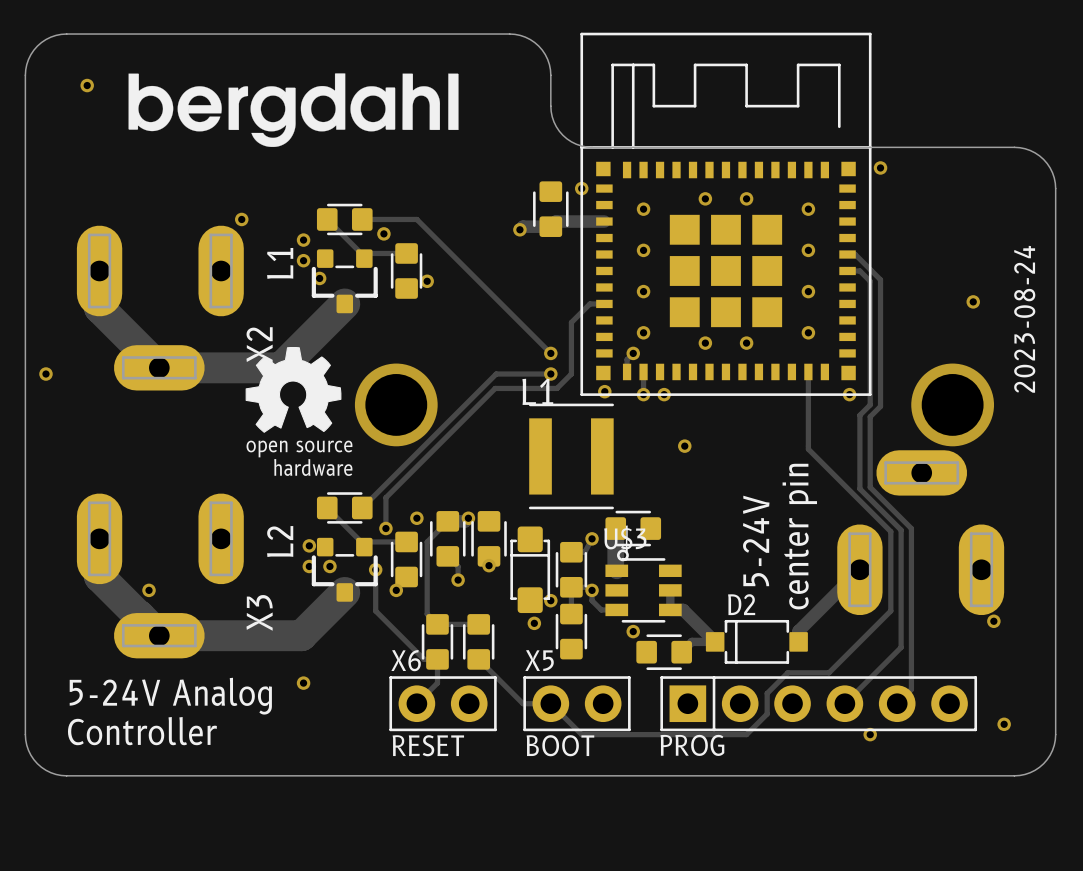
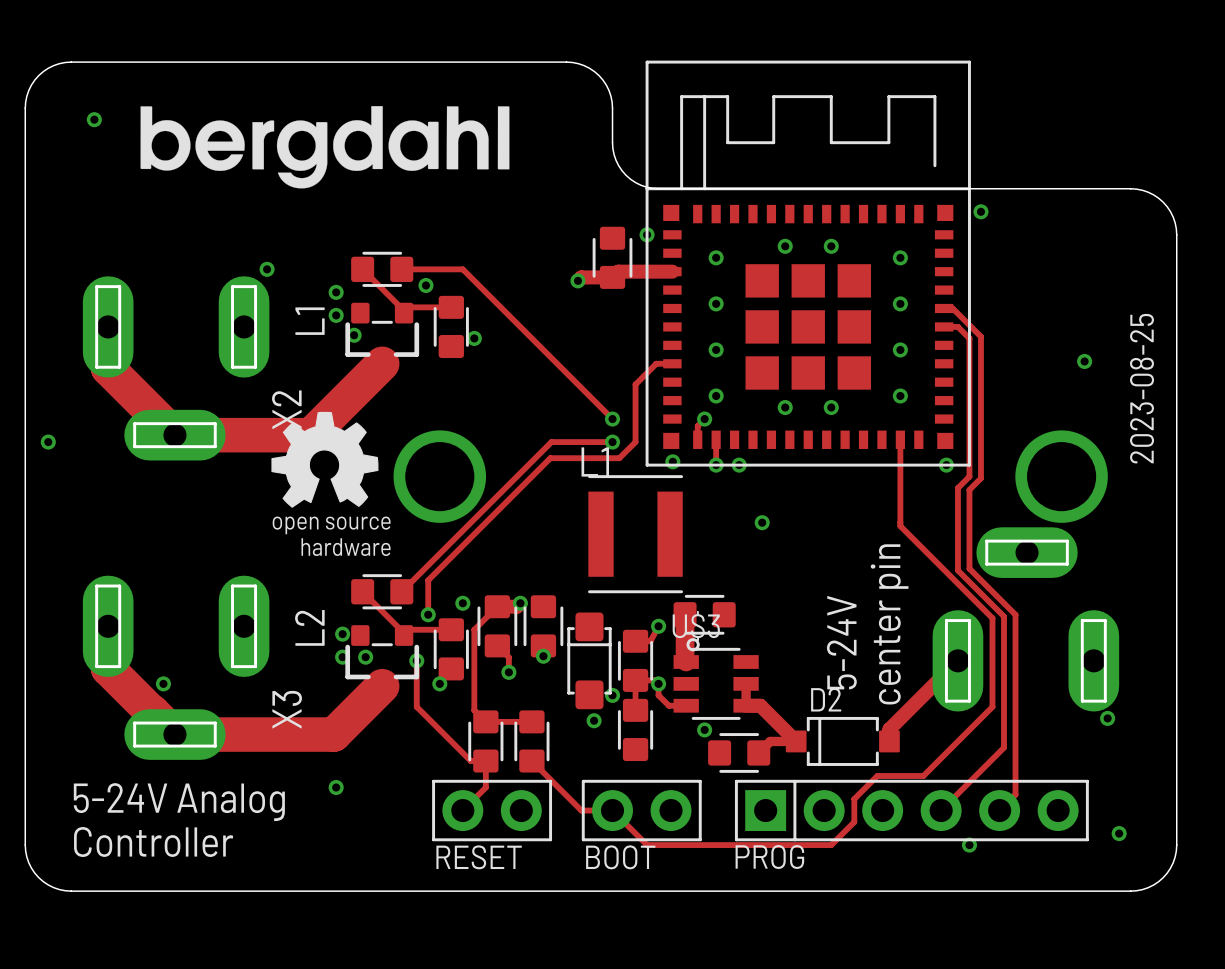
text: 2023-08-24 (1024, 319) -> 2023-08-25 (1142, 388)
X6 name: X6 (406, 660) -> none
X5 name: X5 (539, 660) -> none

